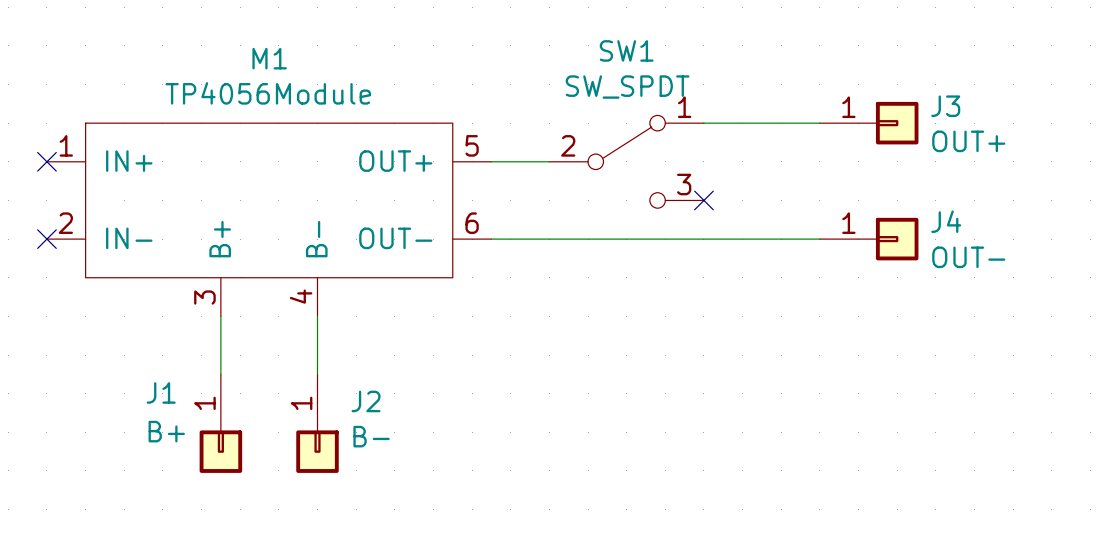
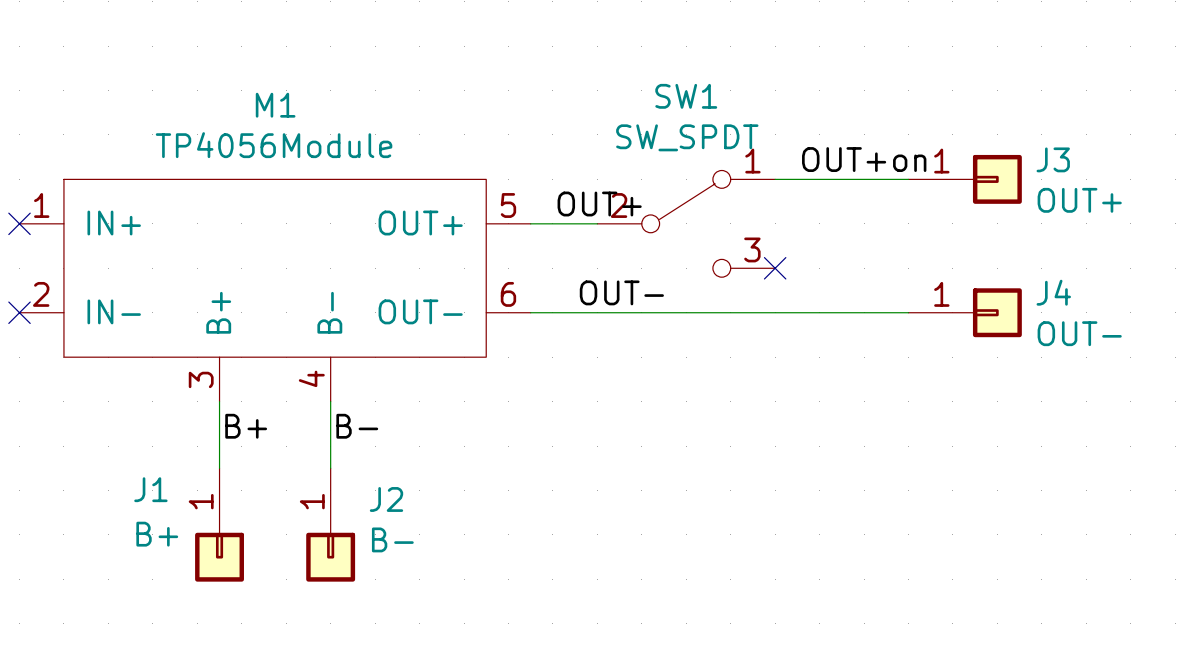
label: none -> OUT+on (864, 159)
label: none -> OUT+ (599, 204)
label: none -> OUT- (621, 292)
label: none -> B+ (246, 426)
label: none -> B- (357, 426)

